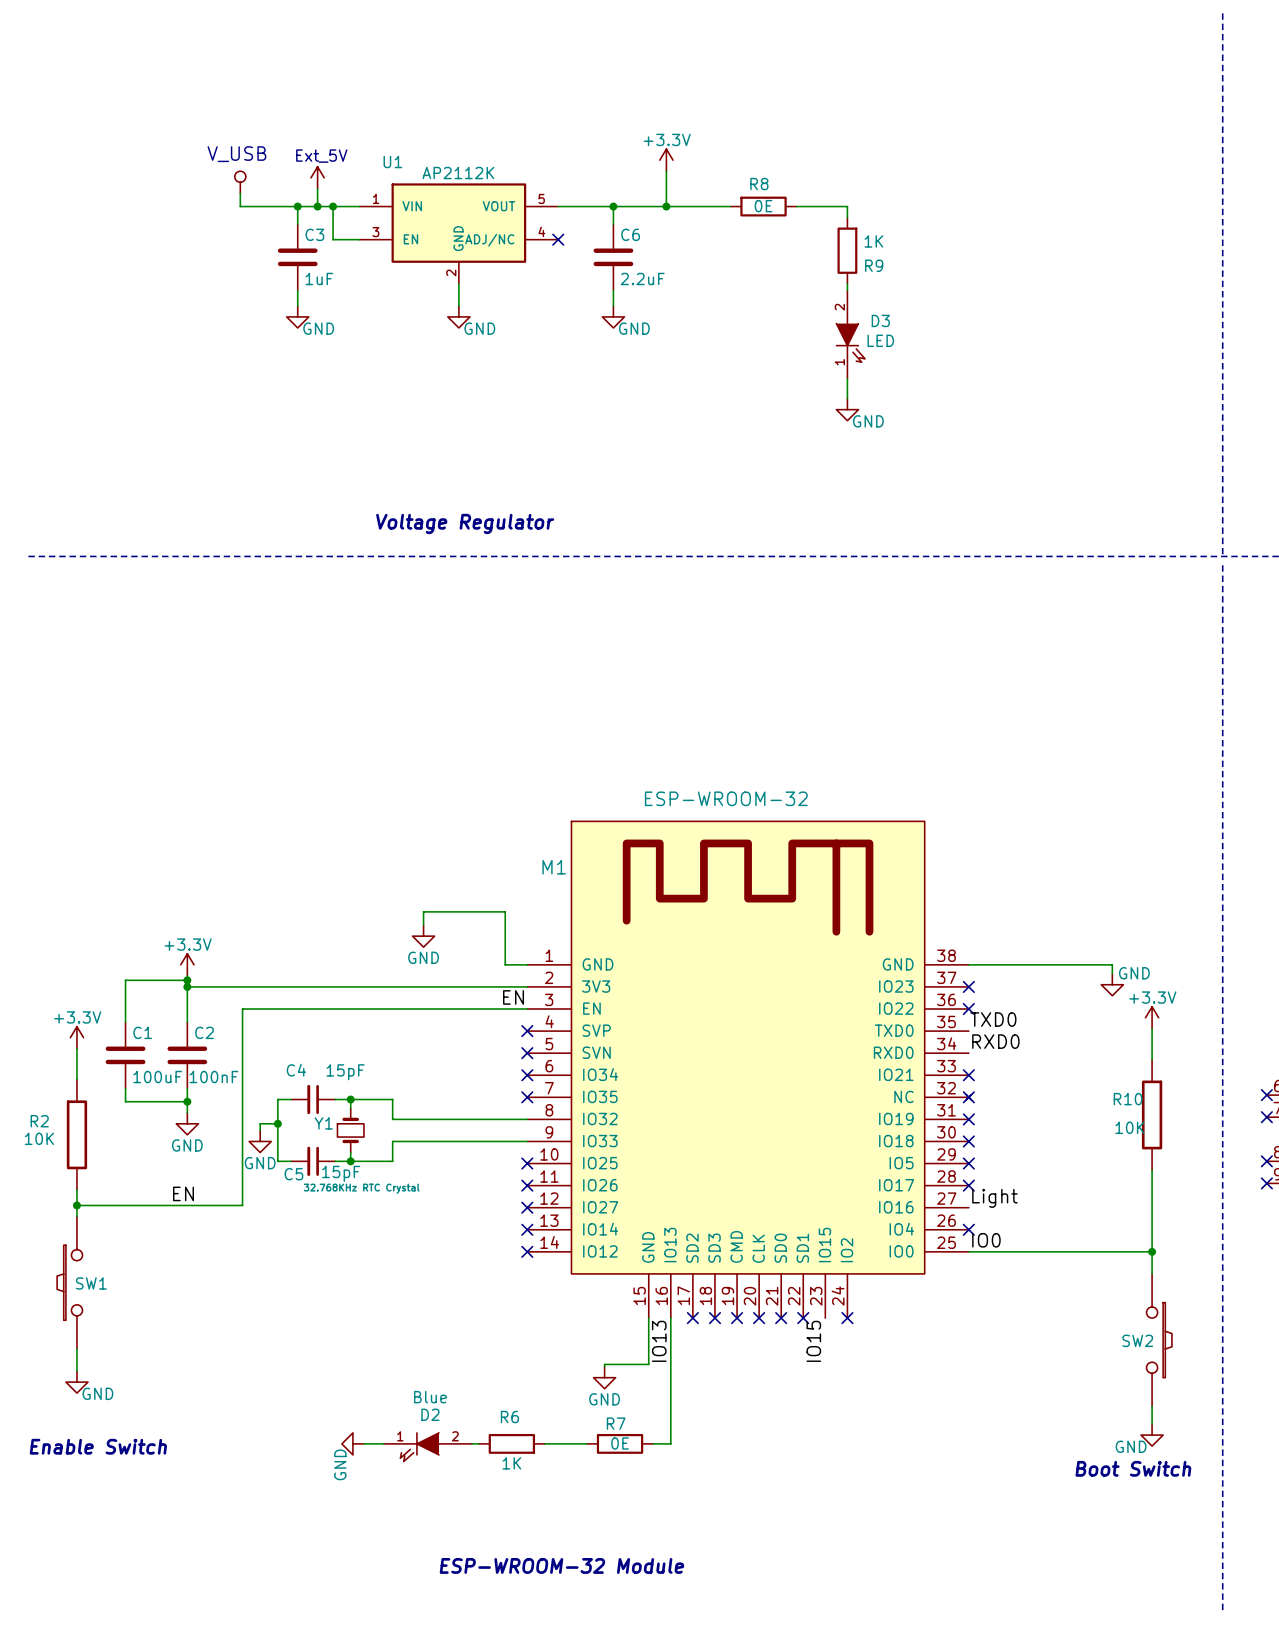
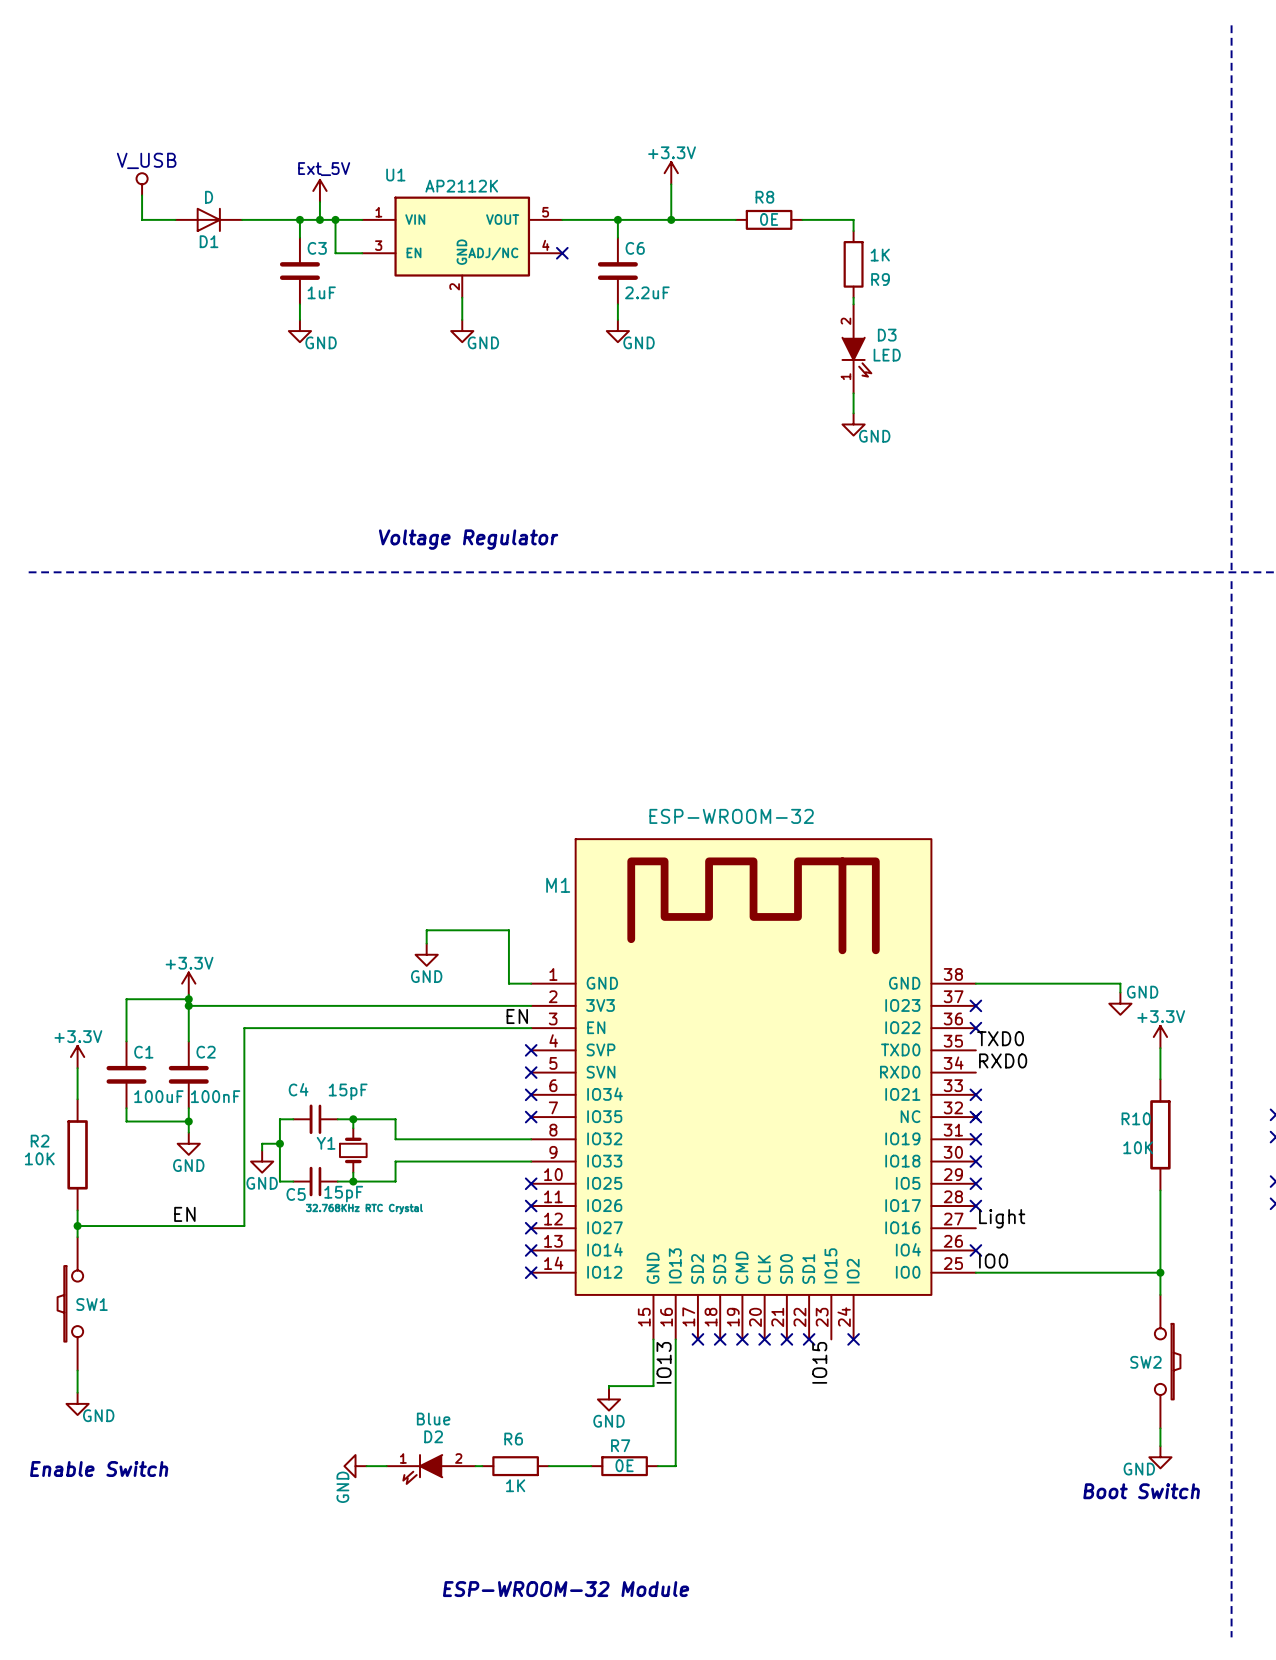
text position: V_USB (236, 154) -> V_USB (146, 160)
wire: none -> (142, 195) (142, 219) (175, 219)
power symbol position: (240, 182) -> (142, 184)
wire: (240, 193) (240, 206) -> none
D1: none -> D (208, 219)

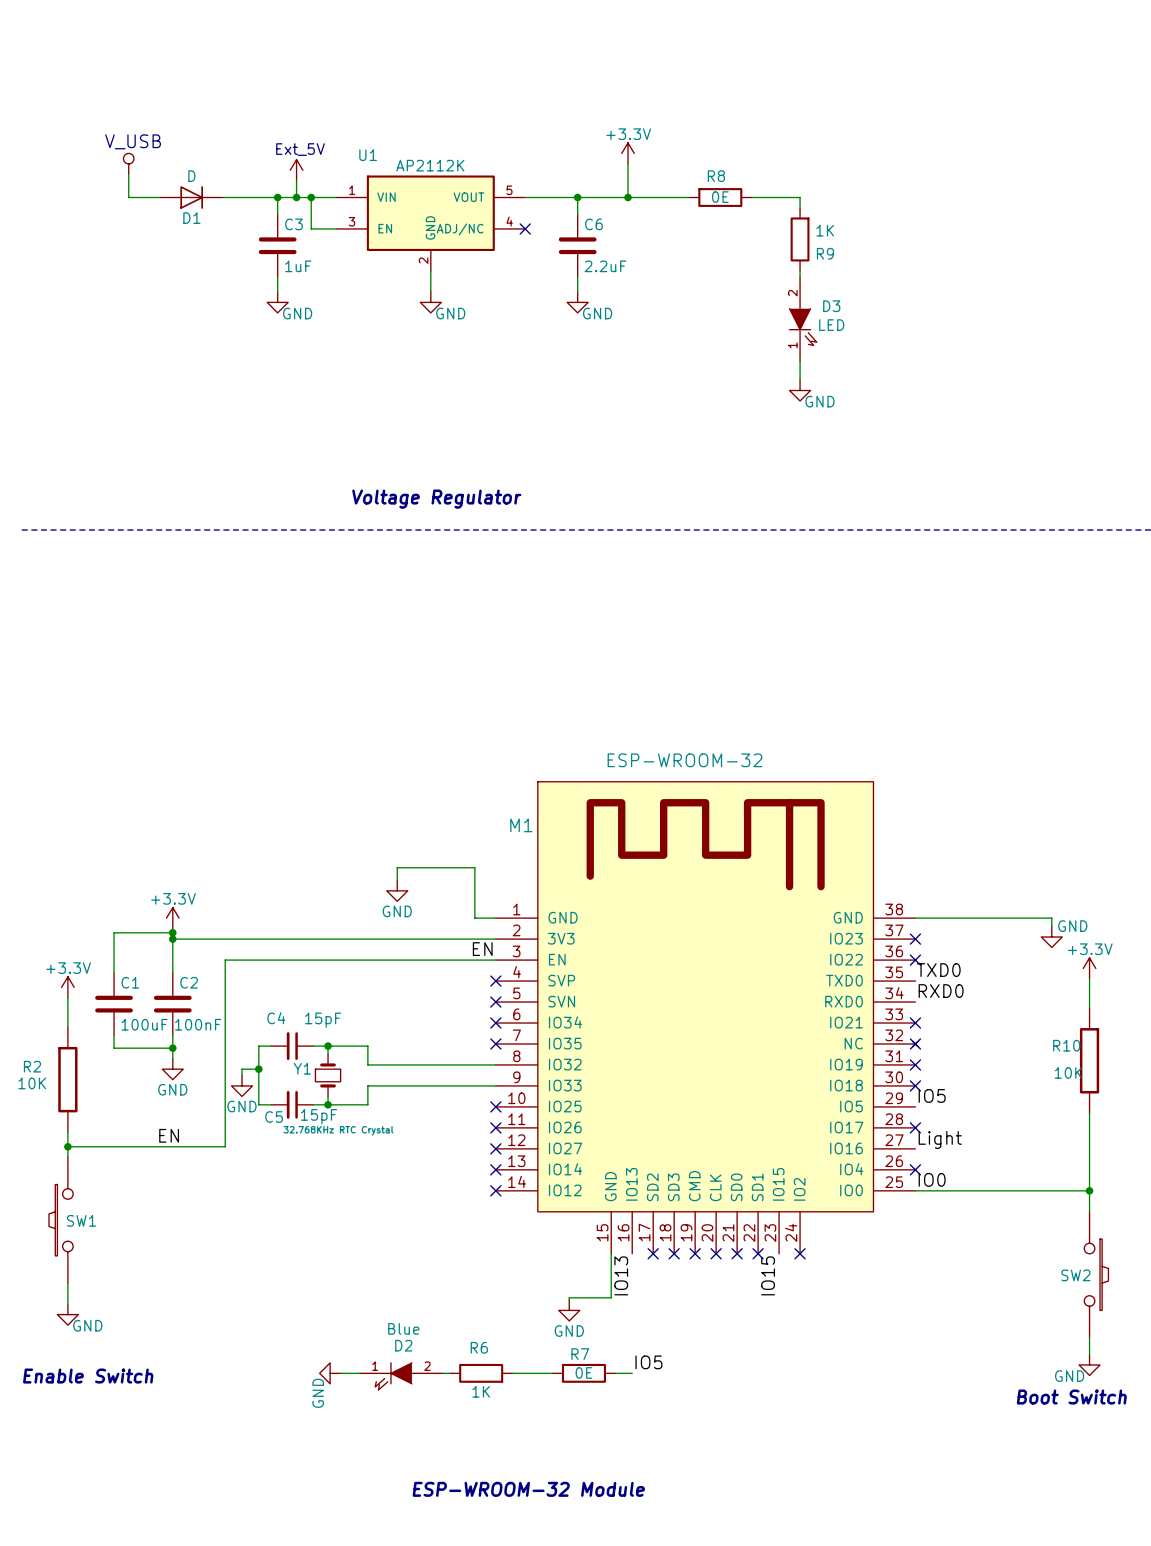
label: none -> IO5 (932, 1095)
no-connect mark: (975, 1183) -> none
wire: (675, 1339) (675, 1466) -> none
label: none -> IO5 (648, 1362)

